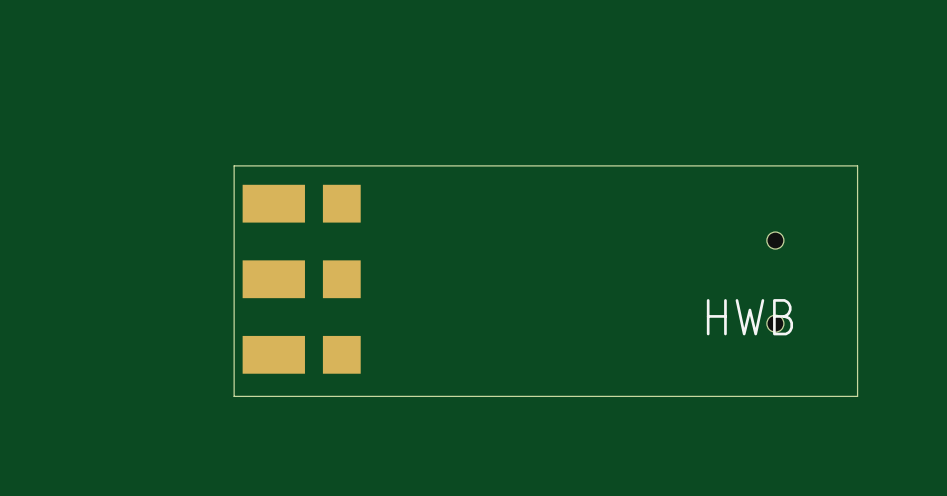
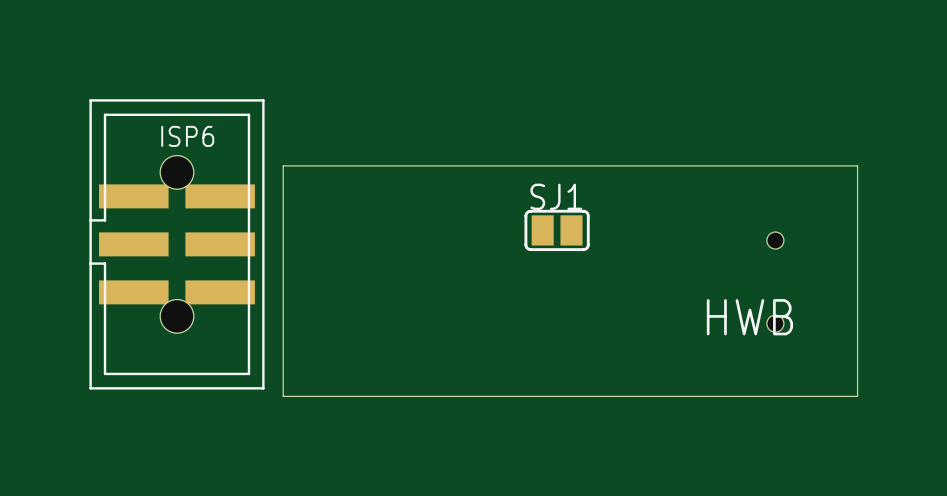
board edge: (283, 165) (234, 165) (234, 396) (283, 396) -> (283, 165) (283, 396)
SJ1: none -> (557, 230)
ISP6: none -> (176, 244)
part: (301, 279) -> none

